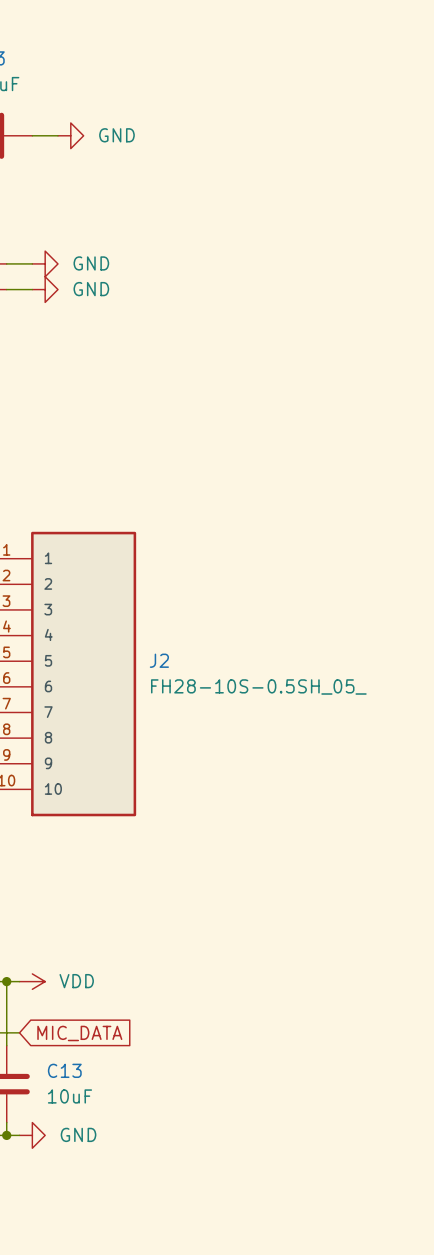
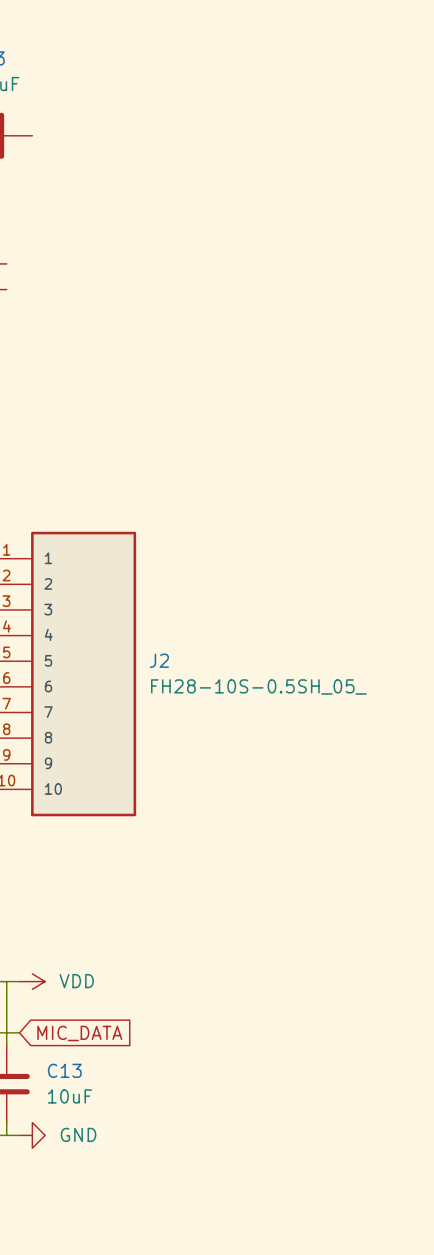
wire: (32, 135) (57, 135) -> none
power symbol: GND (70, 135) -> none
wire: (6, 263) (32, 263) -> none
power symbol: GND (45, 263) -> none
wire: (6, 289) (32, 289) -> none
power symbol: GND (45, 289) -> none
junction: (6, 981) -> none
junction: (6, 1135) -> none

